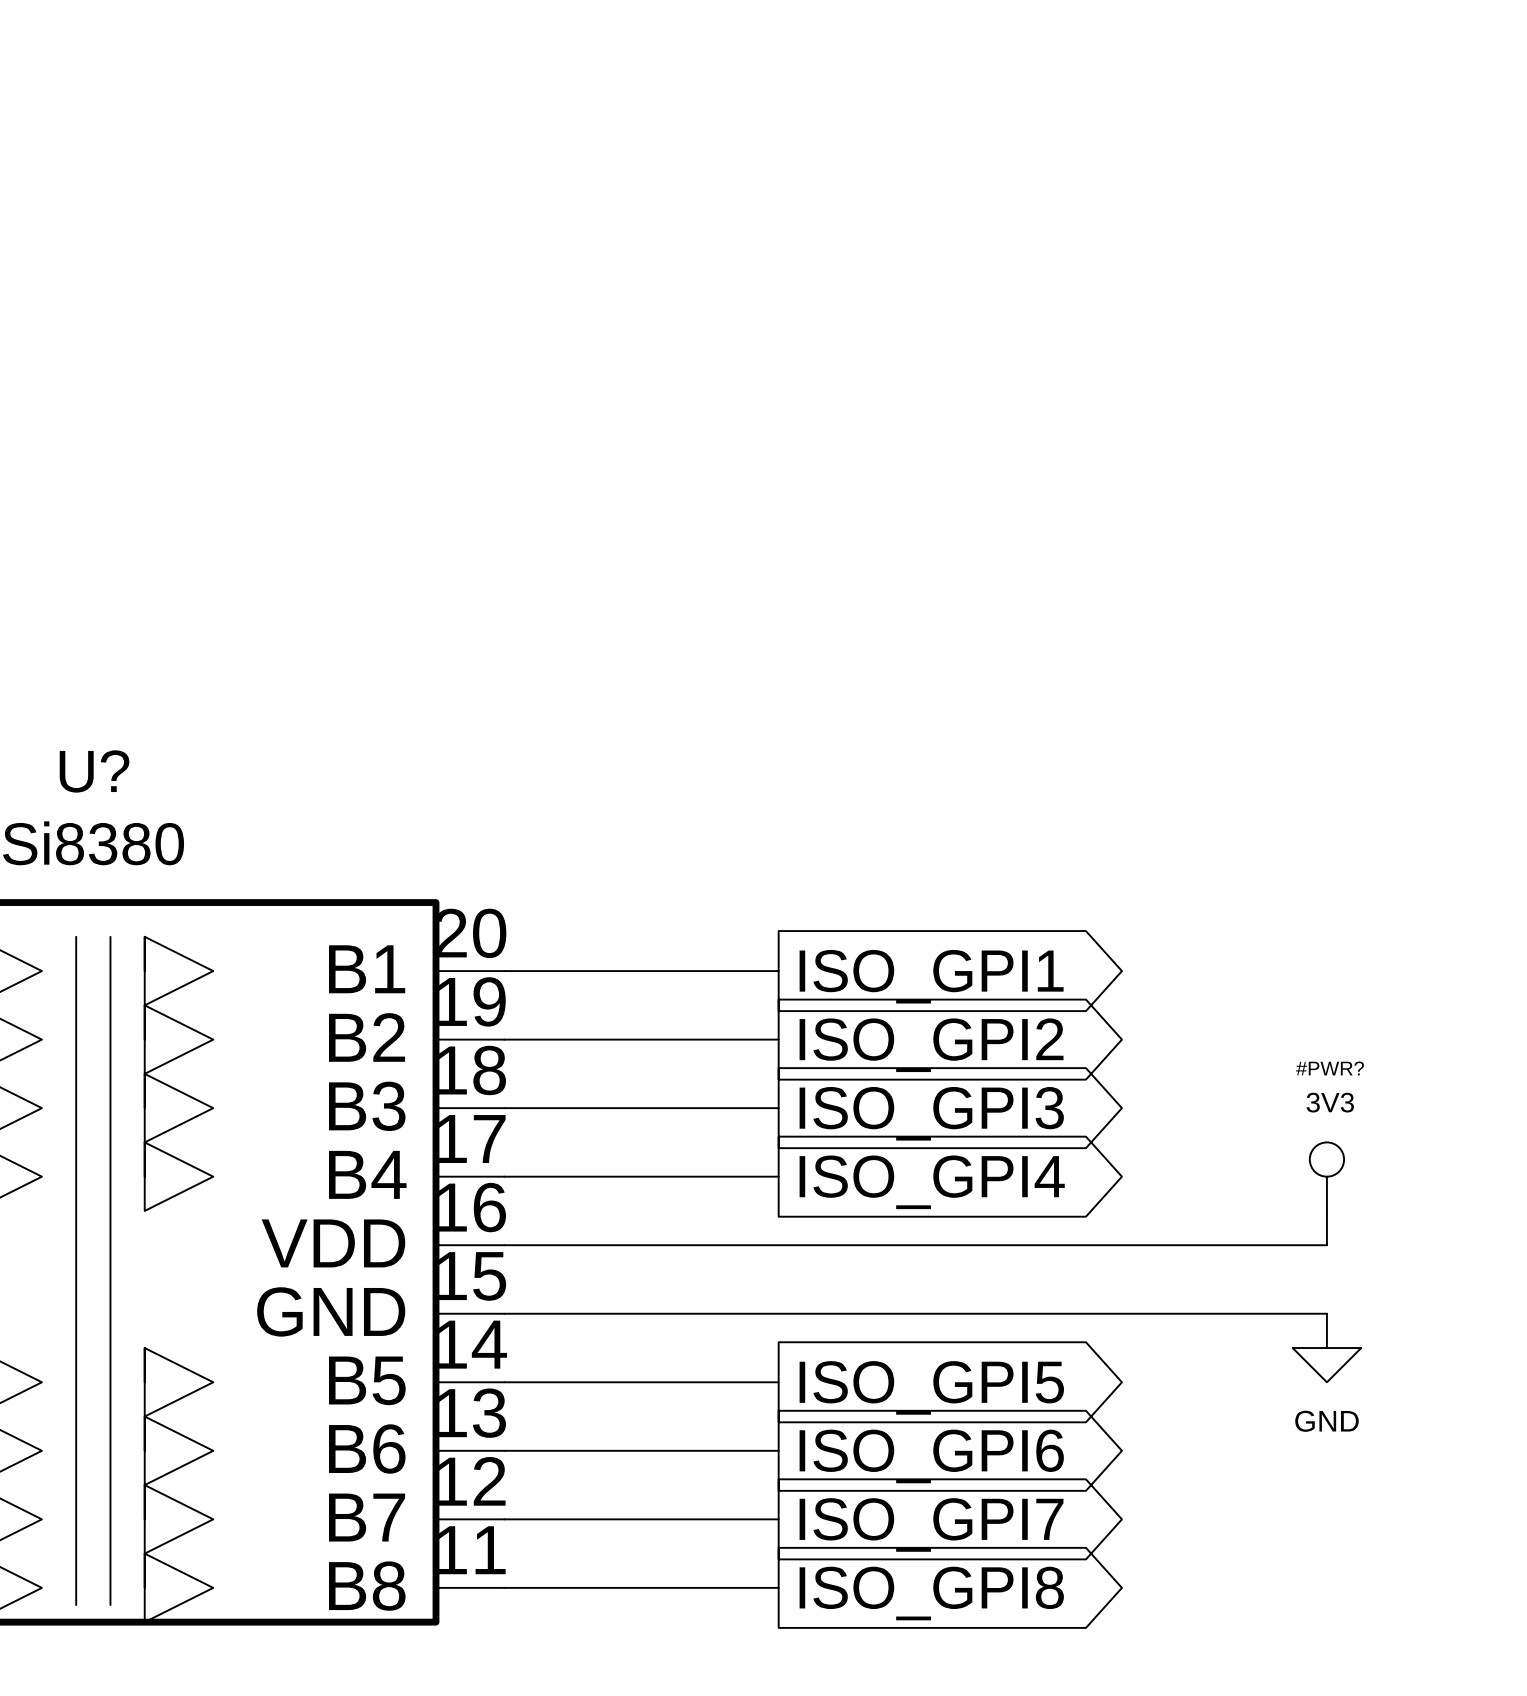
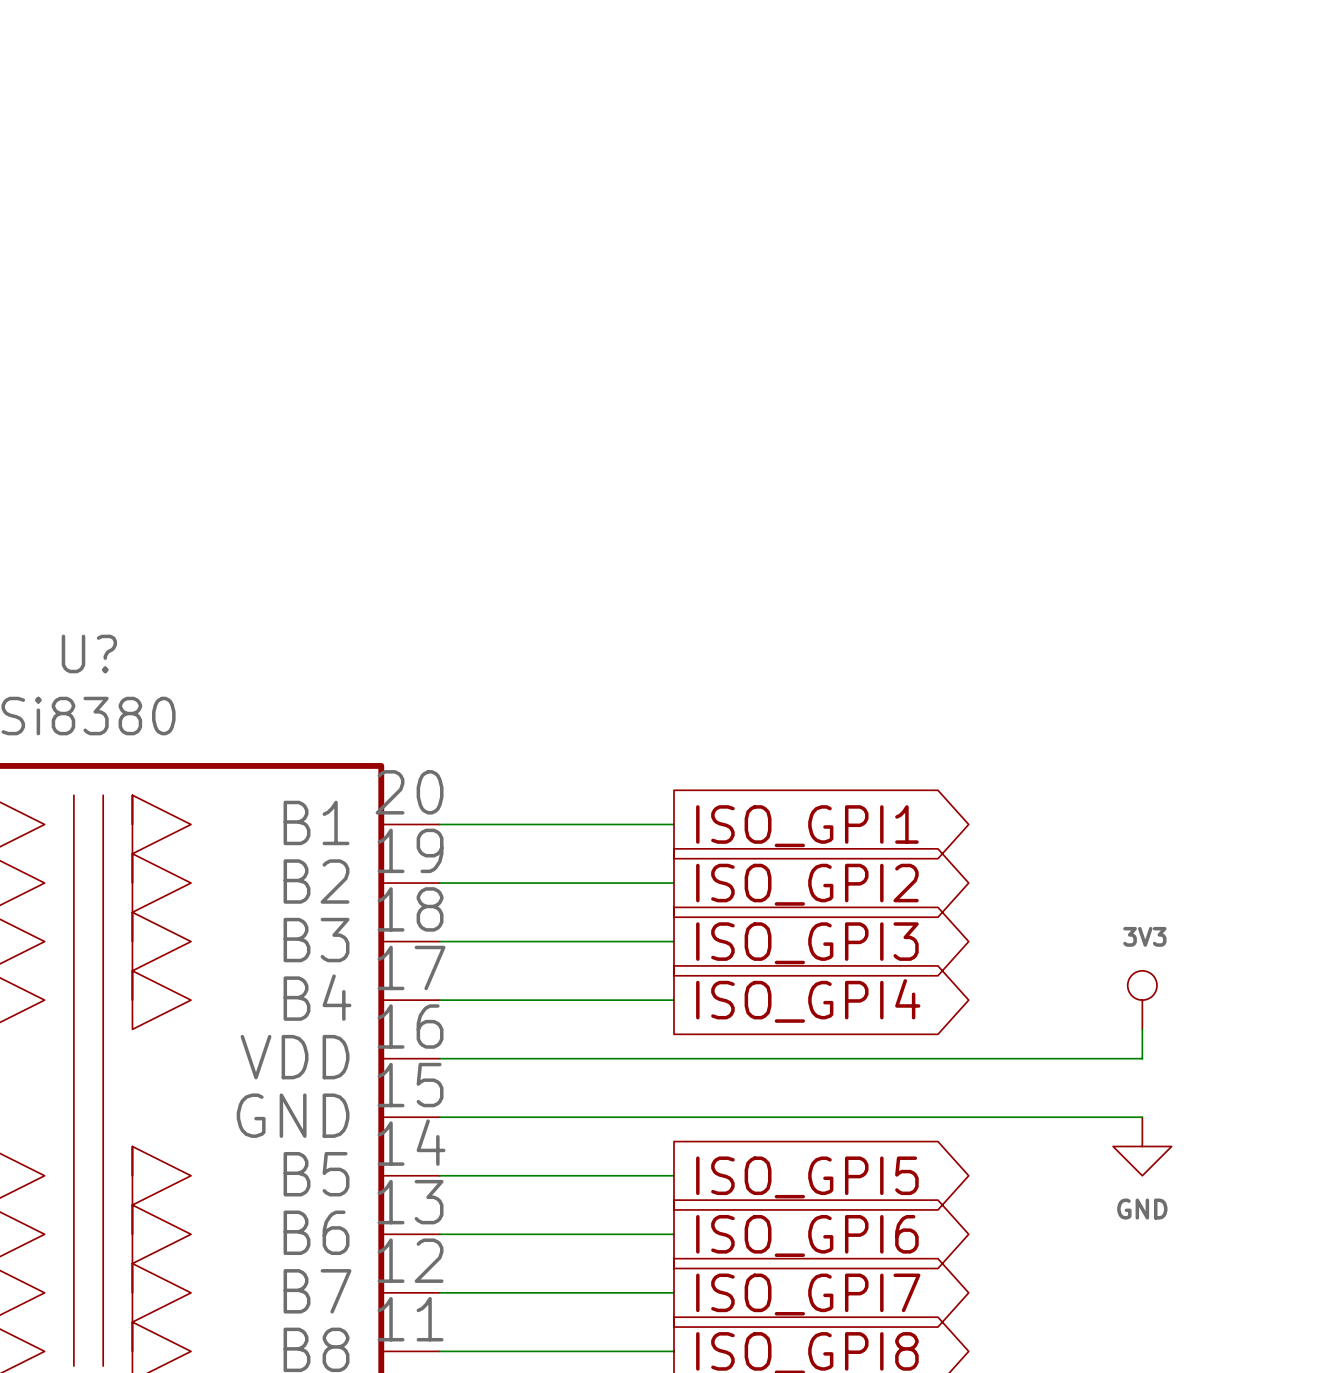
#PWR? name: #PWR? (1330, 1068) -> none

